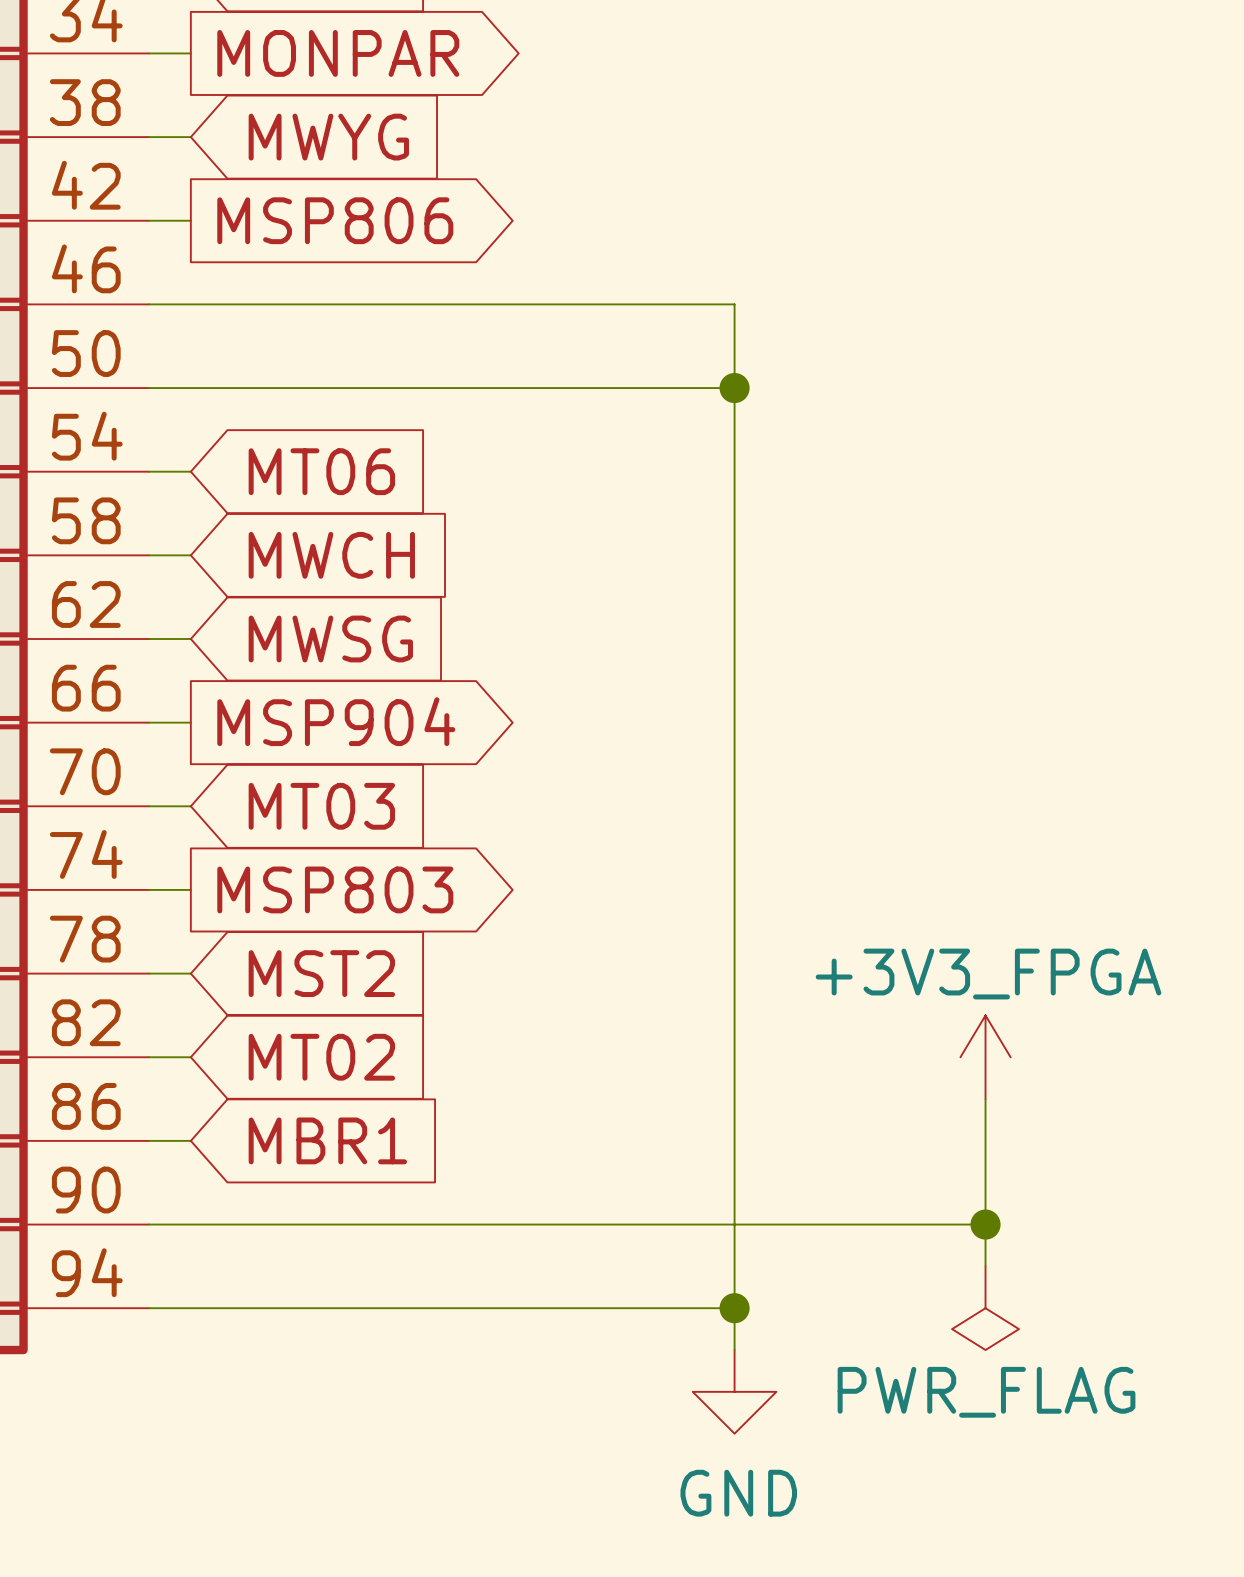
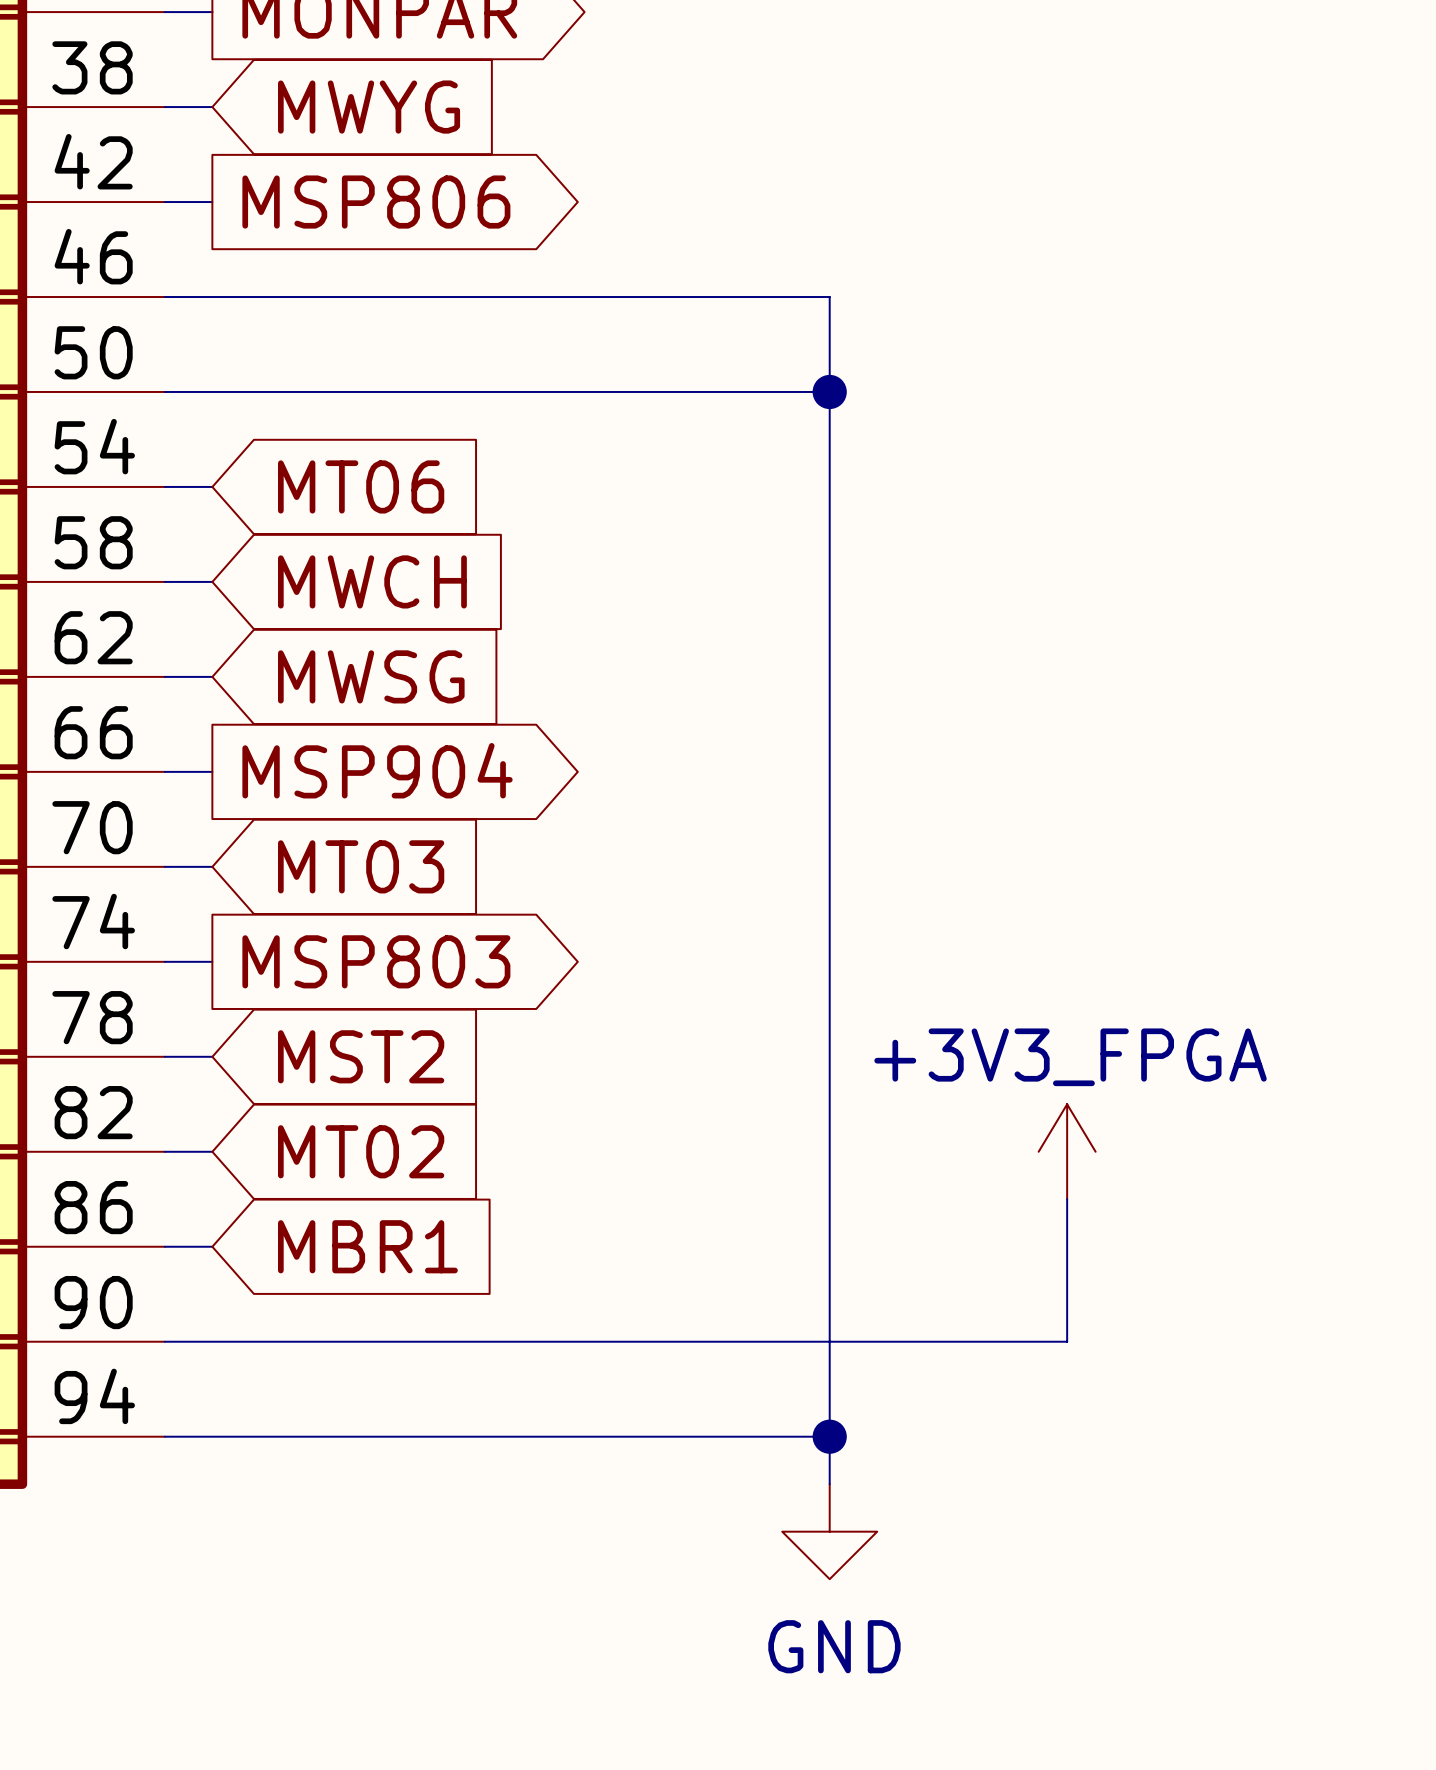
power symbol position: +3V3_FPGA (985, 1057) -> +3V3_FPGA (1067, 1151)
wire: (985, 1099) (985, 1266) -> none
wire: (943, 1224) (985, 1224) -> (1067, 1341) (1067, 1199)
junction: (985, 1224) -> none
power symbol: PWR_FLAG (985, 1308) -> none

